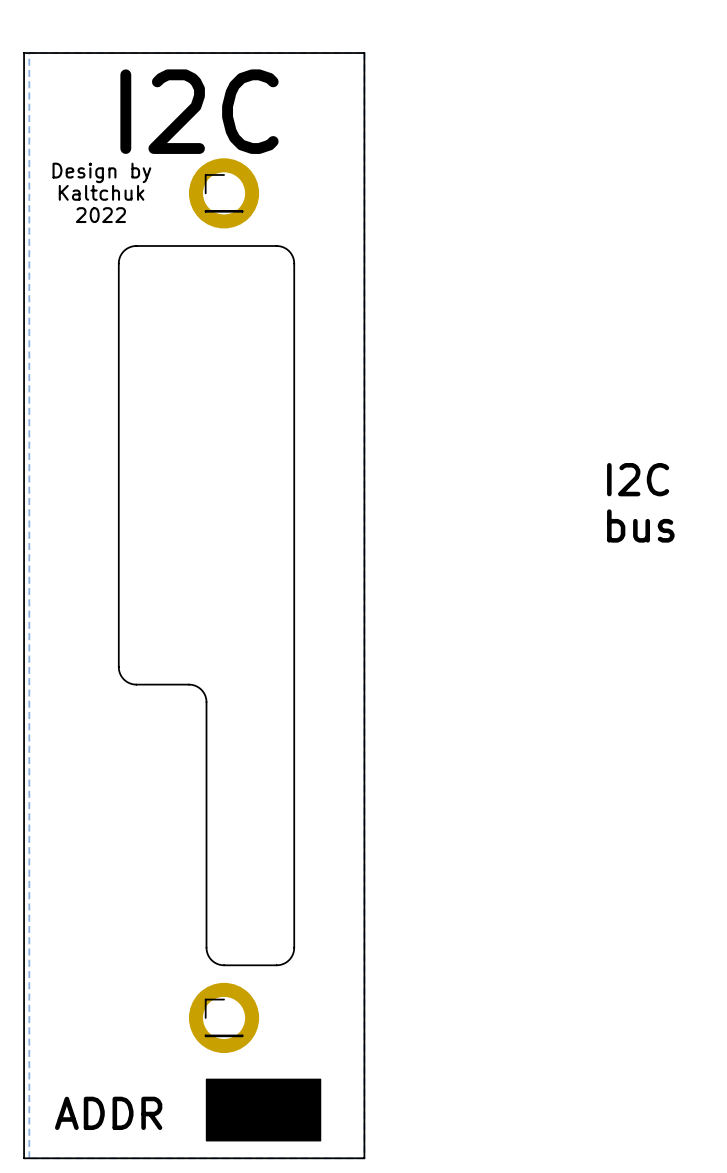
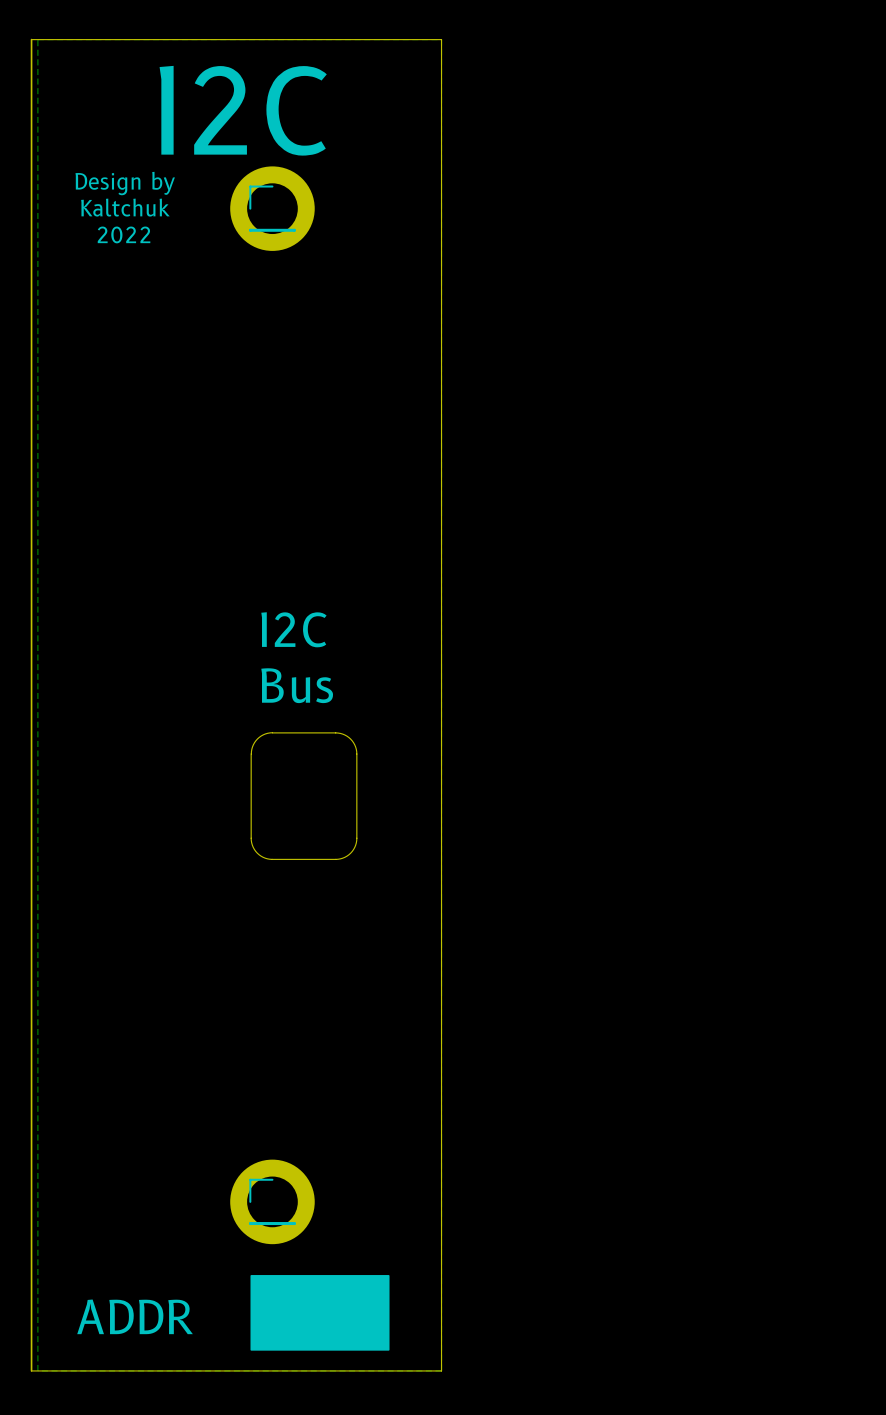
board edge: (136, 246) (278, 246) (287, 249) (293, 259) (294, 947) (290, 958) (280, 964) (220, 964) (211, 960) (206, 951) (206, 702) (204, 694) (199, 688) (190, 684) (132, 684) (123, 679) (119, 670) (118, 263) (123, 251) (136, 246) -> none
text: I2C (638, 479) -> none
text: bus (640, 525) -> none
text: none -> I2C (293, 629)
text: none -> Bus (297, 685)
board edge: none -> (272, 732) (263, 734) (257, 738) (253, 744) (251, 753)
board edge: none -> (272, 732) (338, 733) (346, 736) (353, 742) (356, 754) (356, 838) (354, 847) (350, 853) (338, 859) (272, 859) (265, 858) (257, 853) (251, 840) (251, 754)

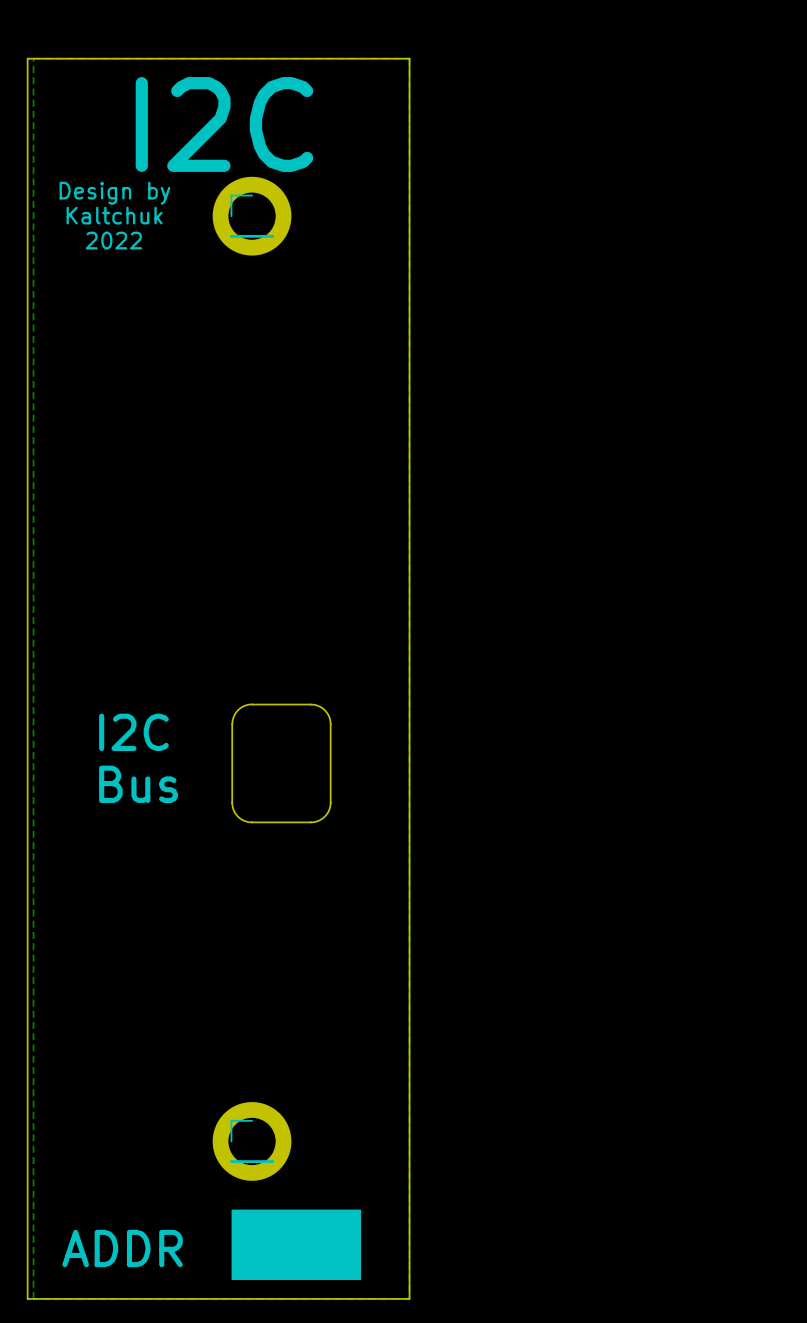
text position: I2C (293, 629) -> I2C (133, 732)
text position: Bus (297, 685) -> Bus (138, 784)

